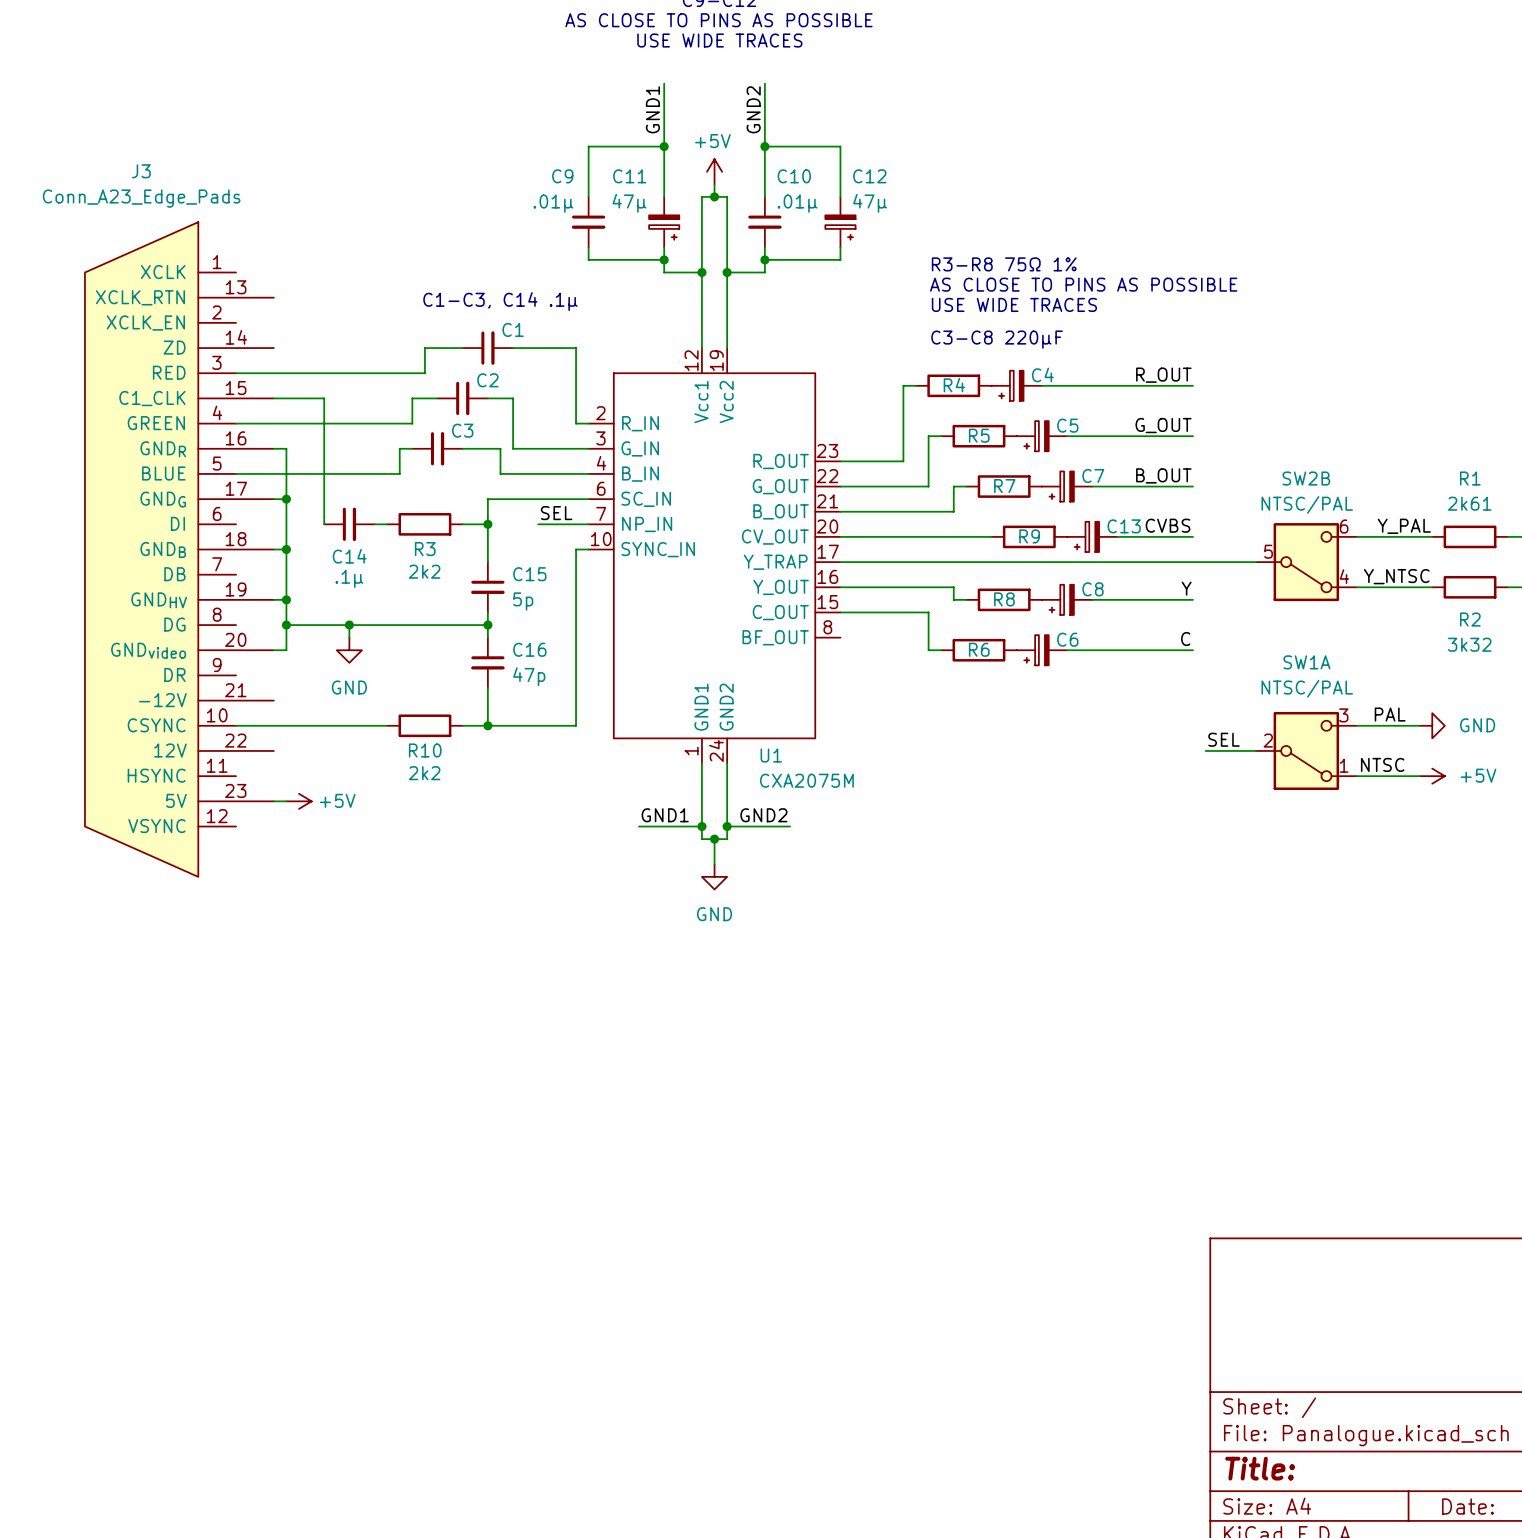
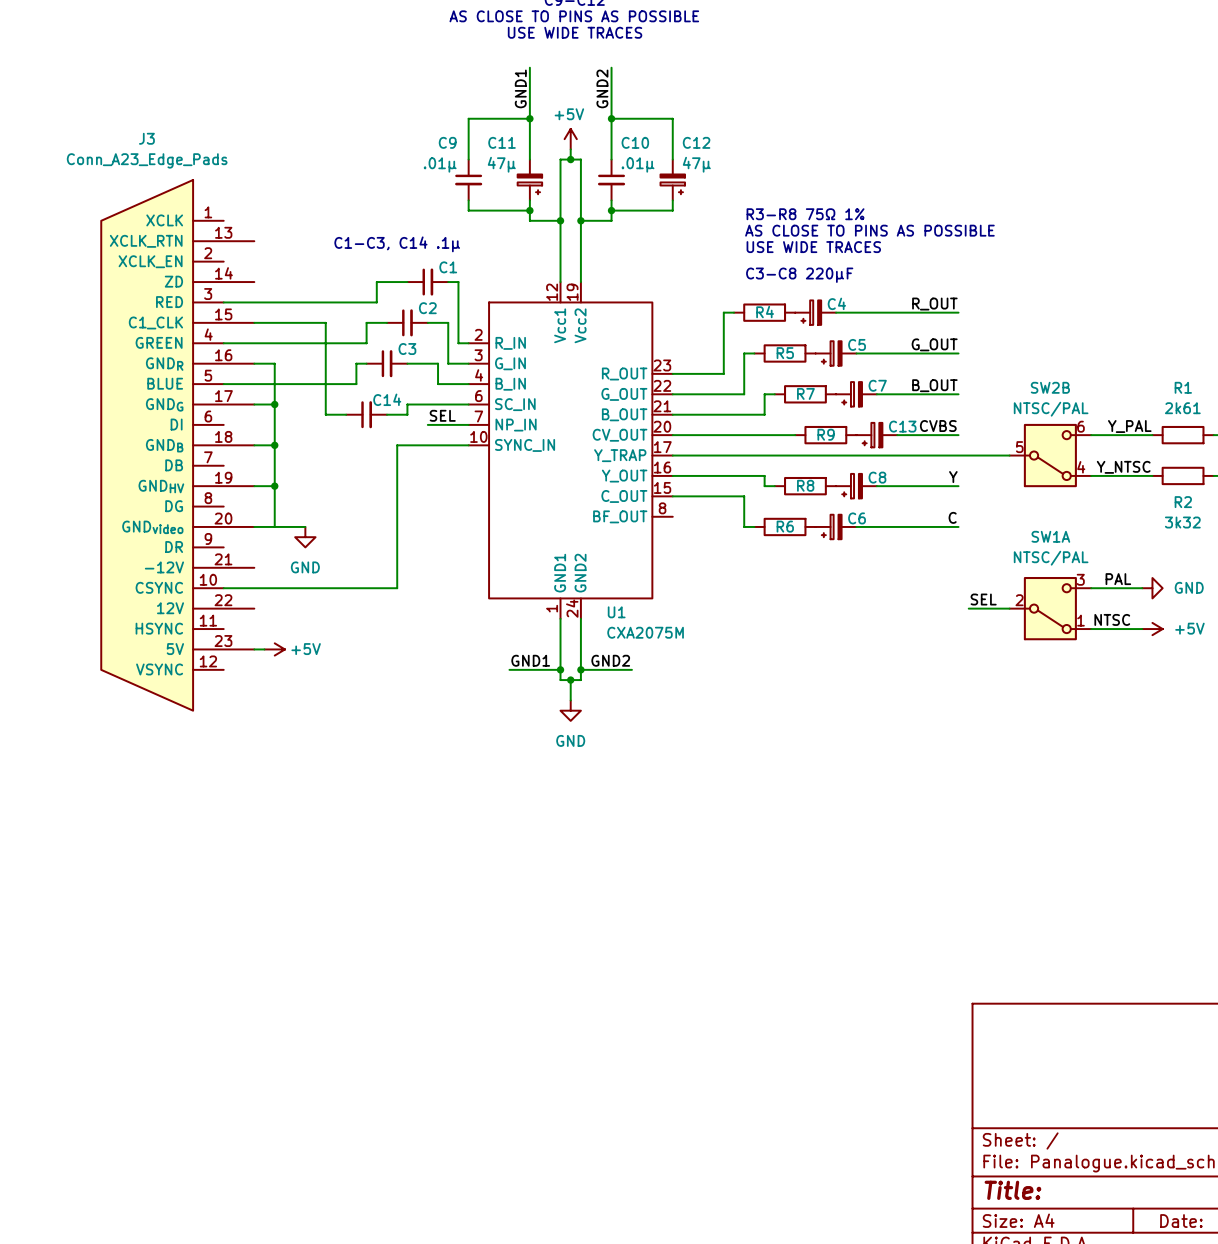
wire: (462, 348) (424, 348) (424, 373) -> (407, 282) (376, 282) (376, 302) (335, 302)
C1 position: (487, 348) -> (427, 282)
wire: (273, 398) (324, 398) (324, 524) -> none
wire: (412, 398) (437, 398) -> (325, 322) (254, 322)
C2 position: (462, 398) -> (407, 322)
wire: (487, 398) (513, 398) (513, 448) -> (387, 322) (366, 322) (366, 343) (325, 343) (325, 414) (346, 414)
wire: none -> (427, 322) (448, 322) (448, 363)
wire: (273, 448) (286, 448) (286, 650) (273, 650) -> none
wire: none -> (254, 363) (274, 363) (274, 506)
wire: (412, 448) (399, 448) (399, 473) -> (366, 363) (356, 363) (356, 384) (315, 384)
C3 position: (437, 448) -> (387, 363)
wire: (462, 448) (500, 448) (500, 473) (550, 473) -> none
wire: (550, 448) (563, 448) -> (438, 363) (438, 384)
junction: (286, 499) -> none
wire: none -> (254, 404) (274, 404)
junction: none -> (274, 404)
wire: (513, 499) (487, 499) (487, 562) -> (407, 404) (407, 414) (387, 414)
C14 position: (349, 524) -> (366, 414)
wire: (374, 524) (387, 524) -> none
R3: 2k2 (424, 524) -> none
wire: (462, 524) (487, 524) -> (254, 445) (274, 445)
junction: (487, 524) -> none
J3 position: (179, 549) -> (177, 445)
junction: (286, 549) -> none
junction: none -> (274, 445)
wire: (576, 549) (576, 725) (500, 725) -> (458, 445) (397, 445) (397, 588)
C14 name position: C14 (349, 556) -> C14 (387, 399)
C14 value: .1µ (349, 578) -> none
C15: 5p (487, 587) -> none
junction: (286, 599) -> none
wire: none -> (254, 486) (274, 486)
wire: (487, 612) (487, 637) -> none
wire: (286, 625) (487, 625) -> none
junction: (286, 625) -> none
junction position: (349, 625) -> (274, 486)
junction: (487, 625) -> none
wire: none -> (254, 526) (305, 526)
power symbol position: GND (349, 650) -> GND (305, 537)
C16: 47p (487, 662) -> none
wire: (487, 688) (487, 725) -> none
wire: none -> (305, 588) (366, 588)
R10: 2k2 (424, 725) -> none
junction: (487, 725) -> none
power symbol position: +5V (299, 801) -> +5V (274, 649)

